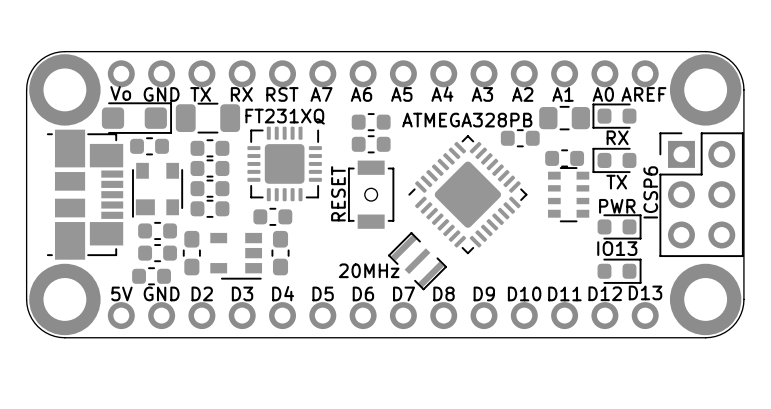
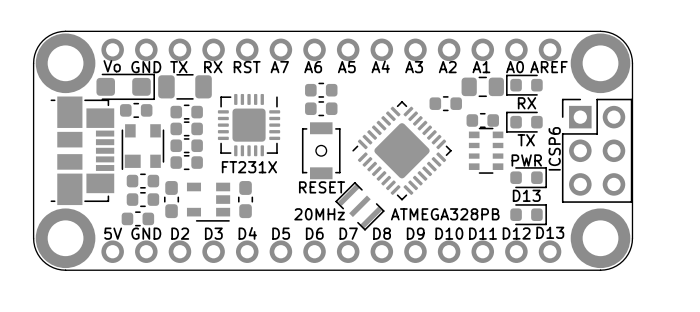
FT231XQ name: FT231XQ (285, 116) -> FT231X (249, 167)
text position: ATMEGA328PB (467, 120) -> ATMEGA328PB (445, 214)
RESET name rotation: 0° (338, 193) -> 90° clockwise (322, 187)
part: (272, 216) -> none
IO13 name: IO13 (617, 248) -> D13 (526, 195)

